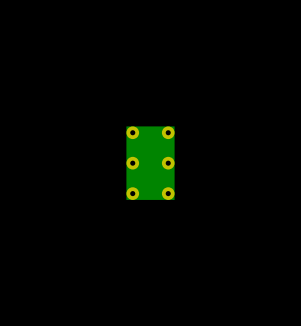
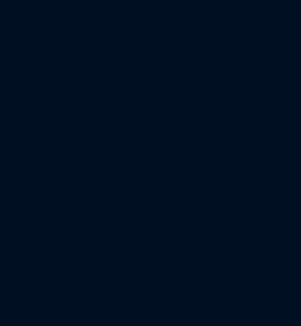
part: (150, 163) -> none

